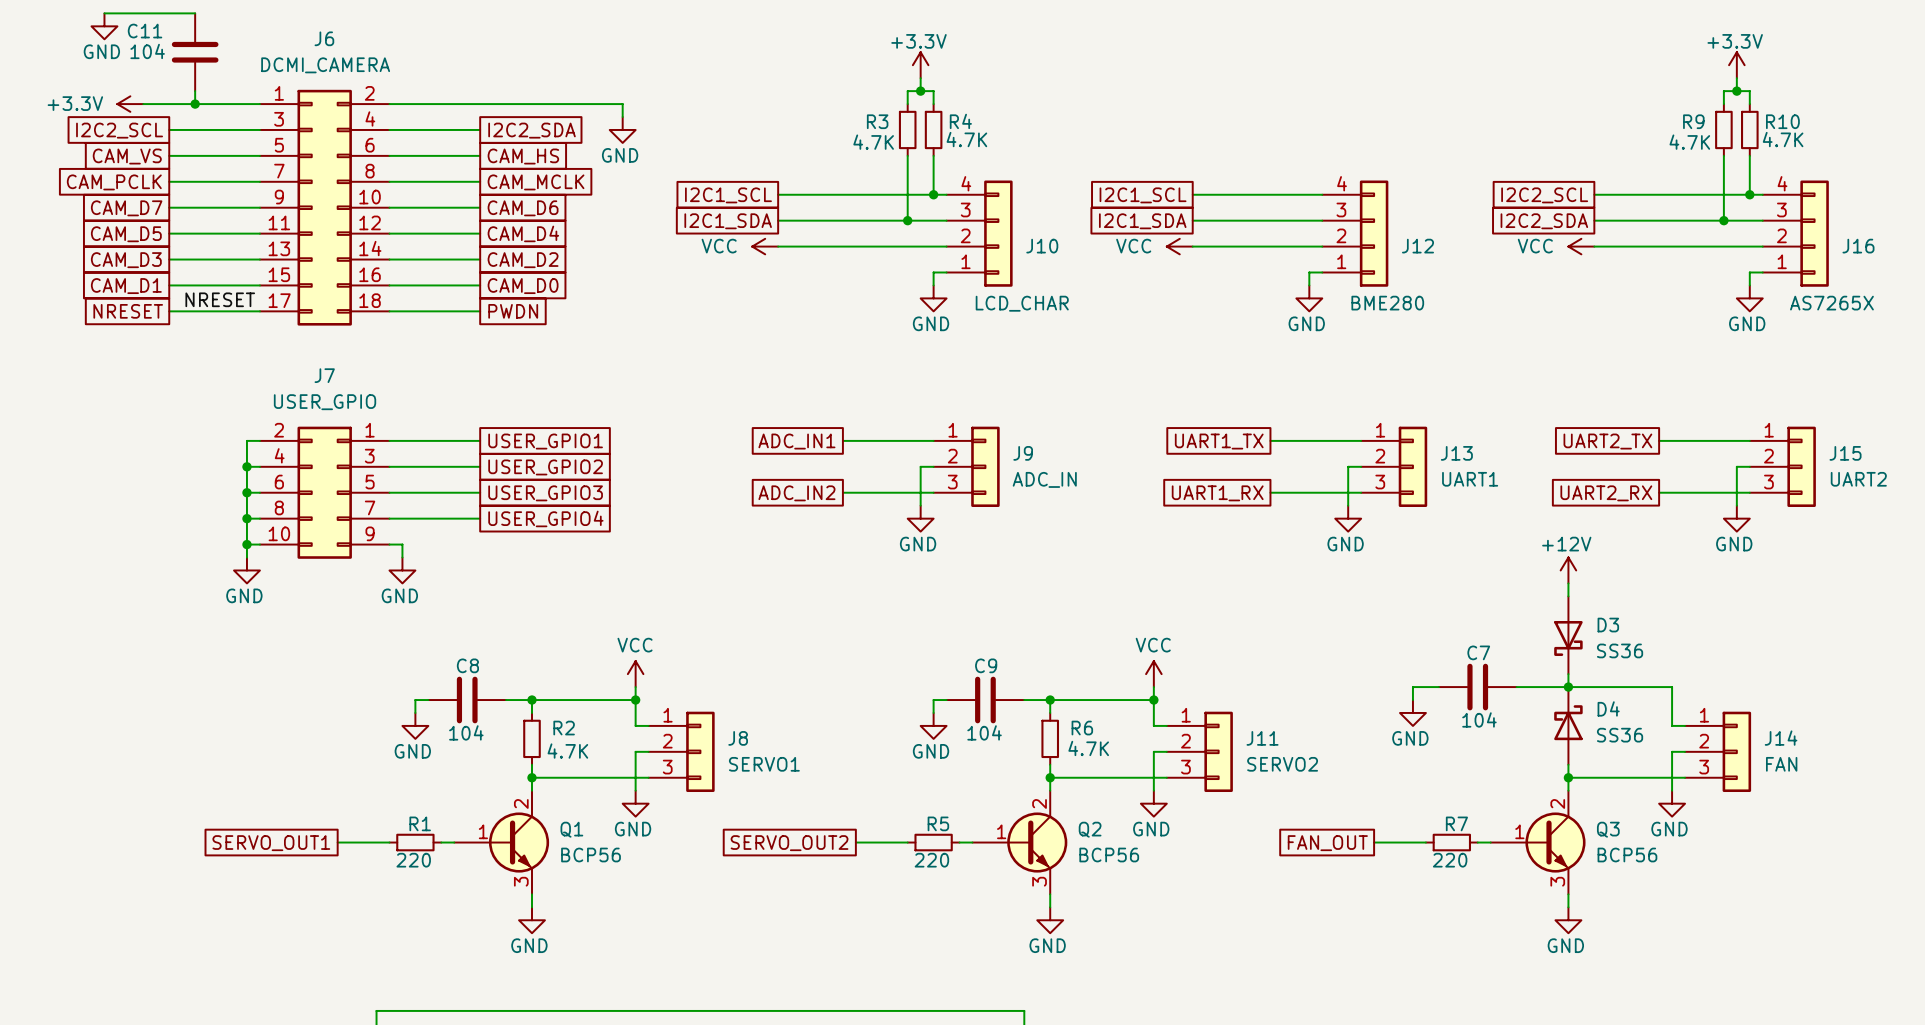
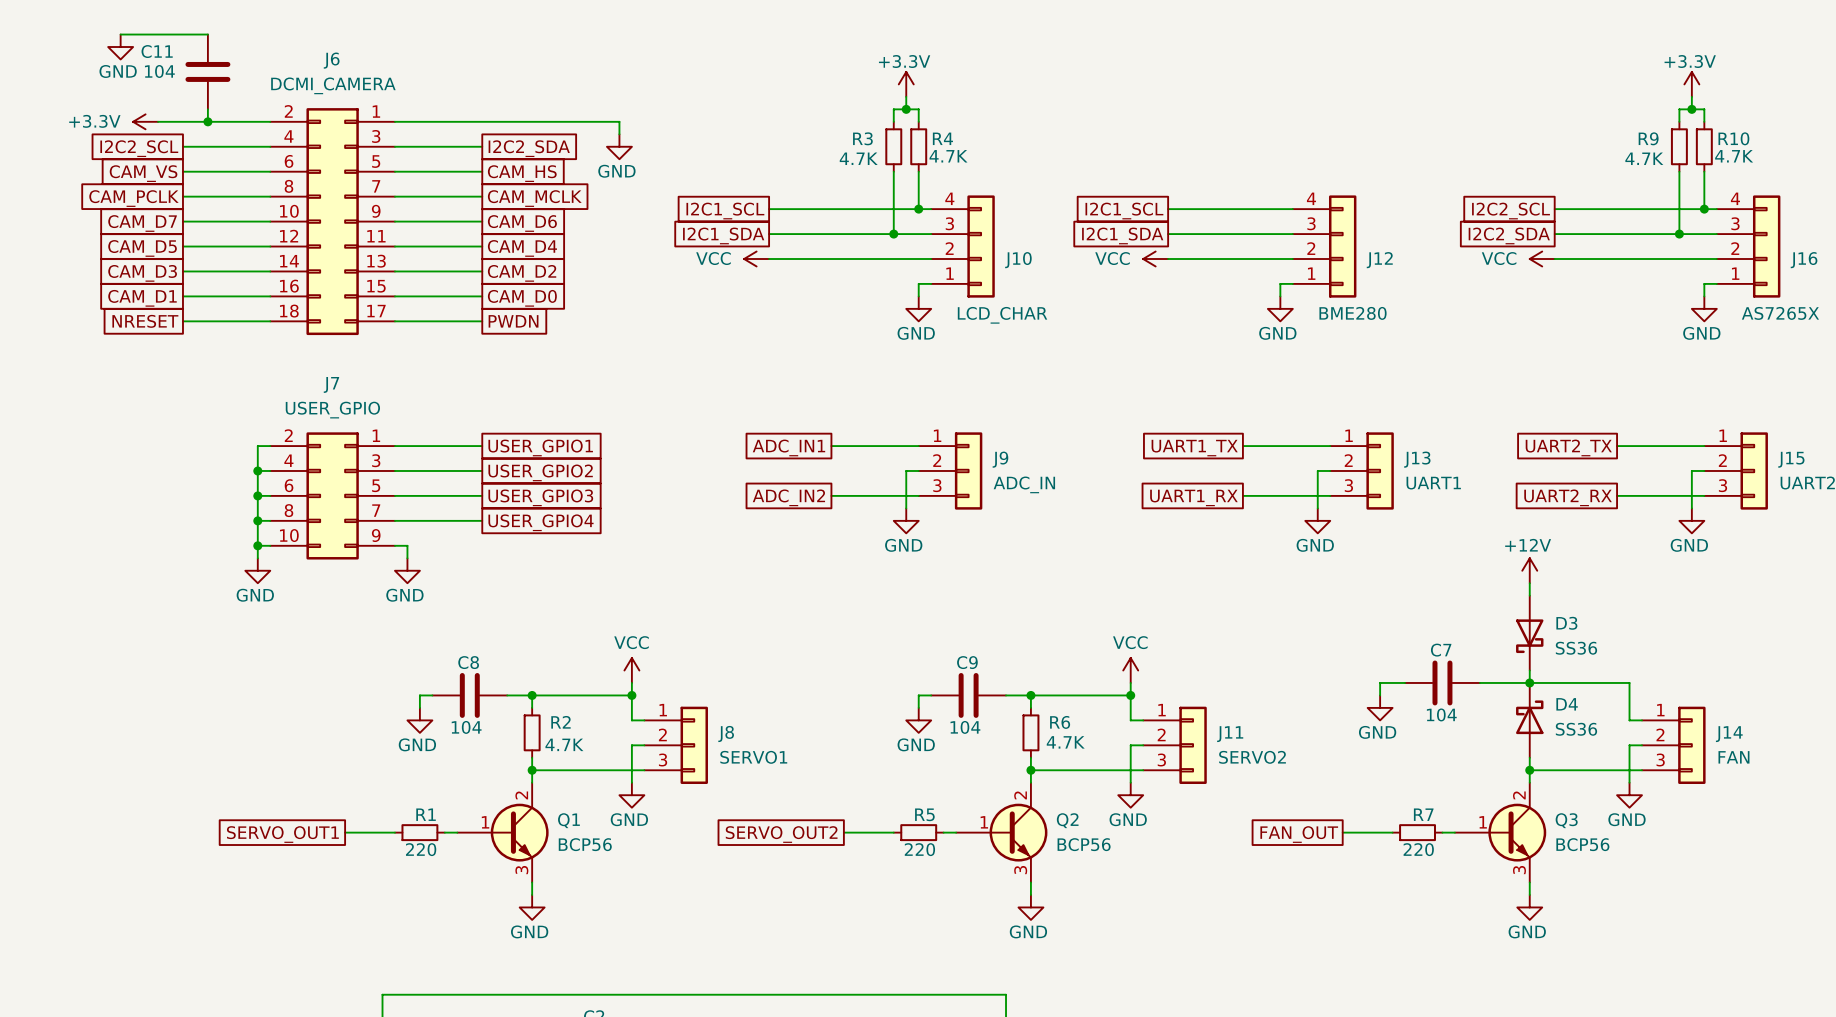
J6 flip: as is (324, 207) -> left-right (332, 221)
label: NRESET (220, 299) -> none

